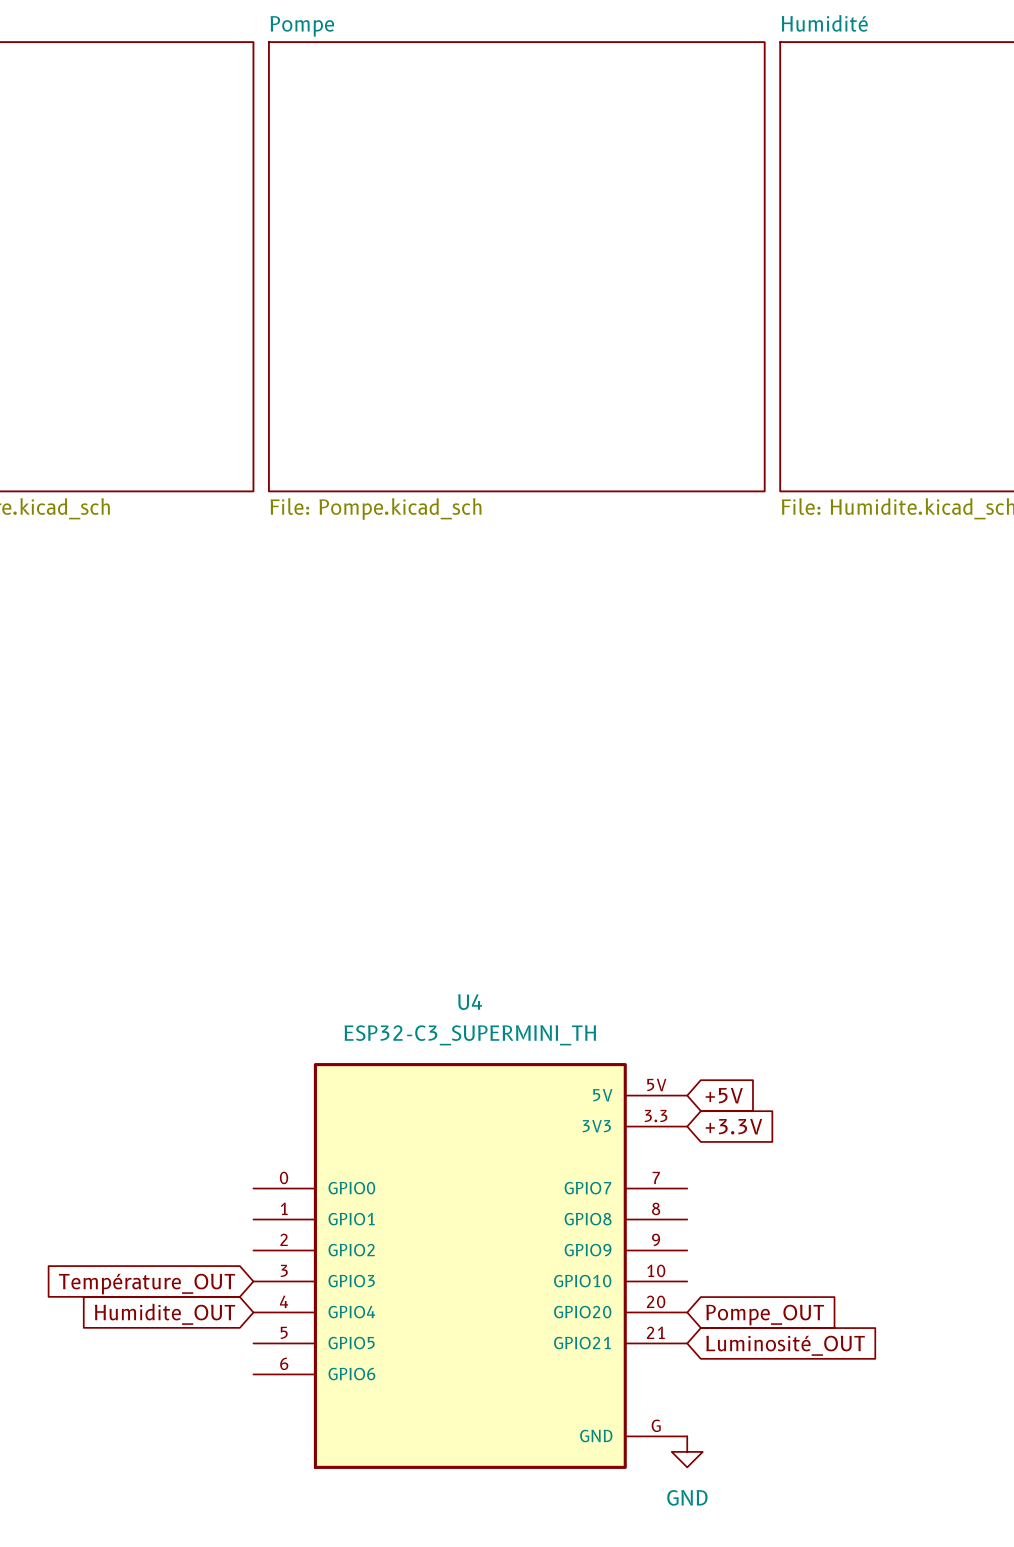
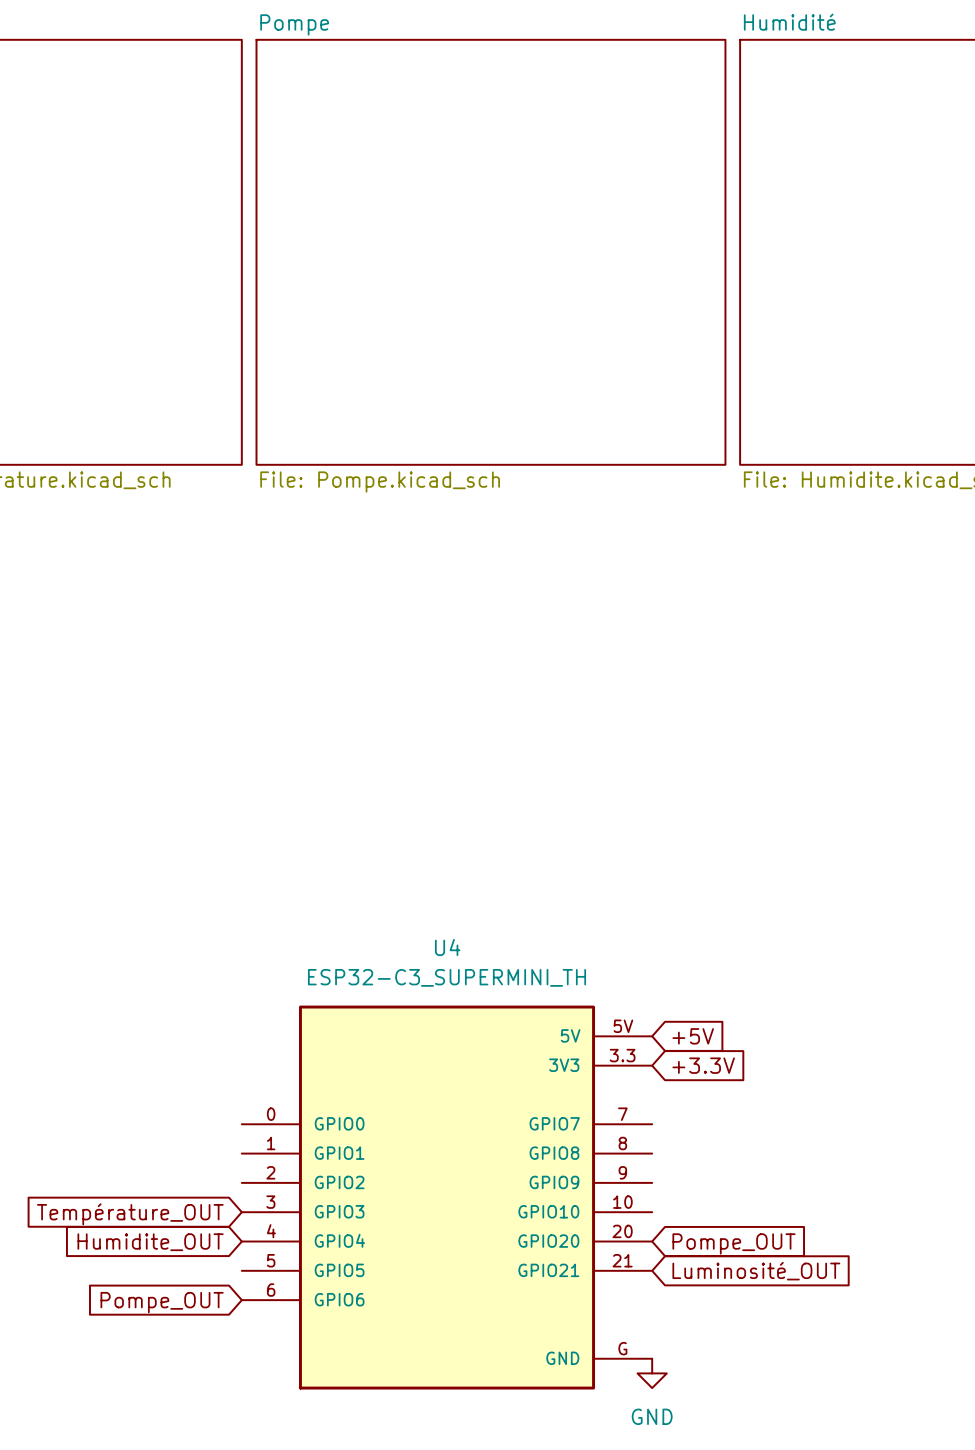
global label: none -> Pompe_OUT (162, 1302)

